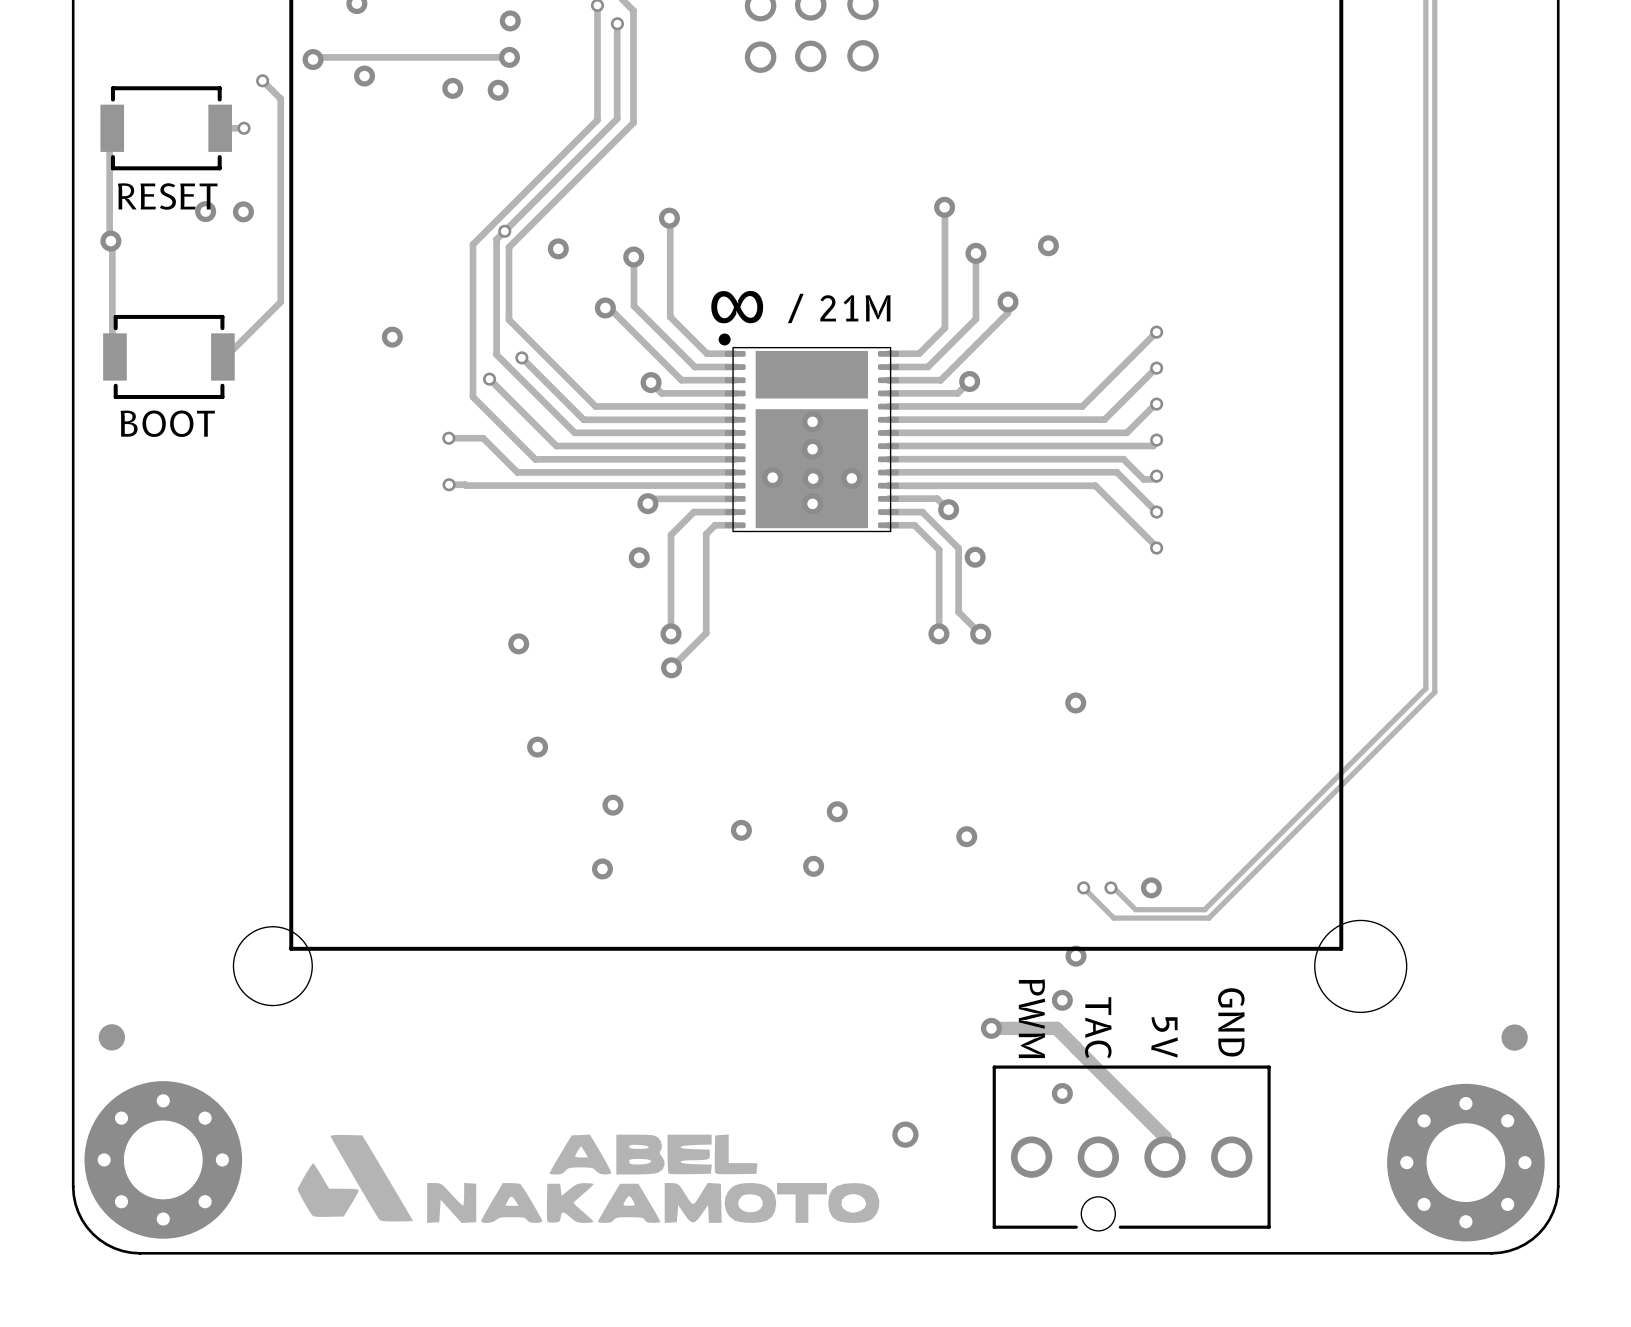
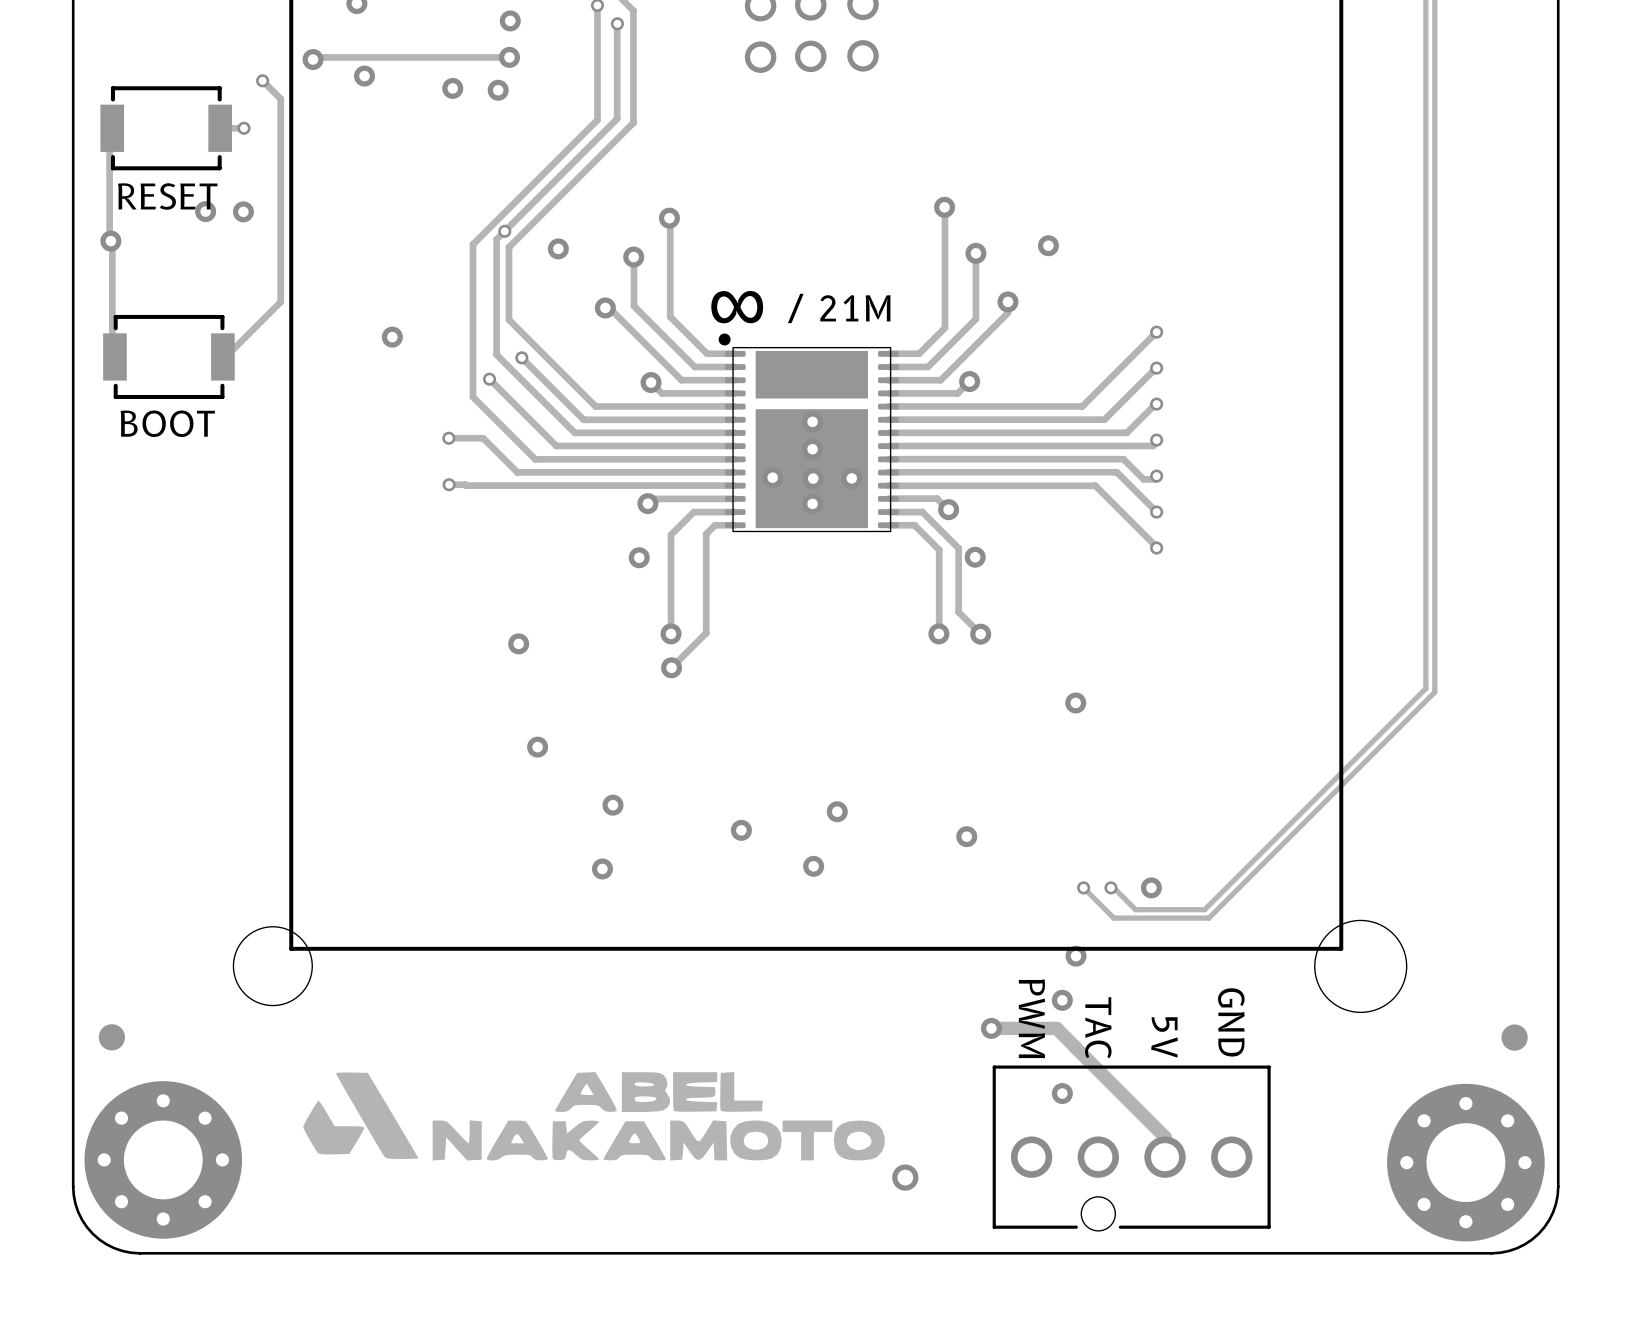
via position: (905, 1134) -> (905, 1177)
drawing position: (588, 1178) -> (593, 1116)

